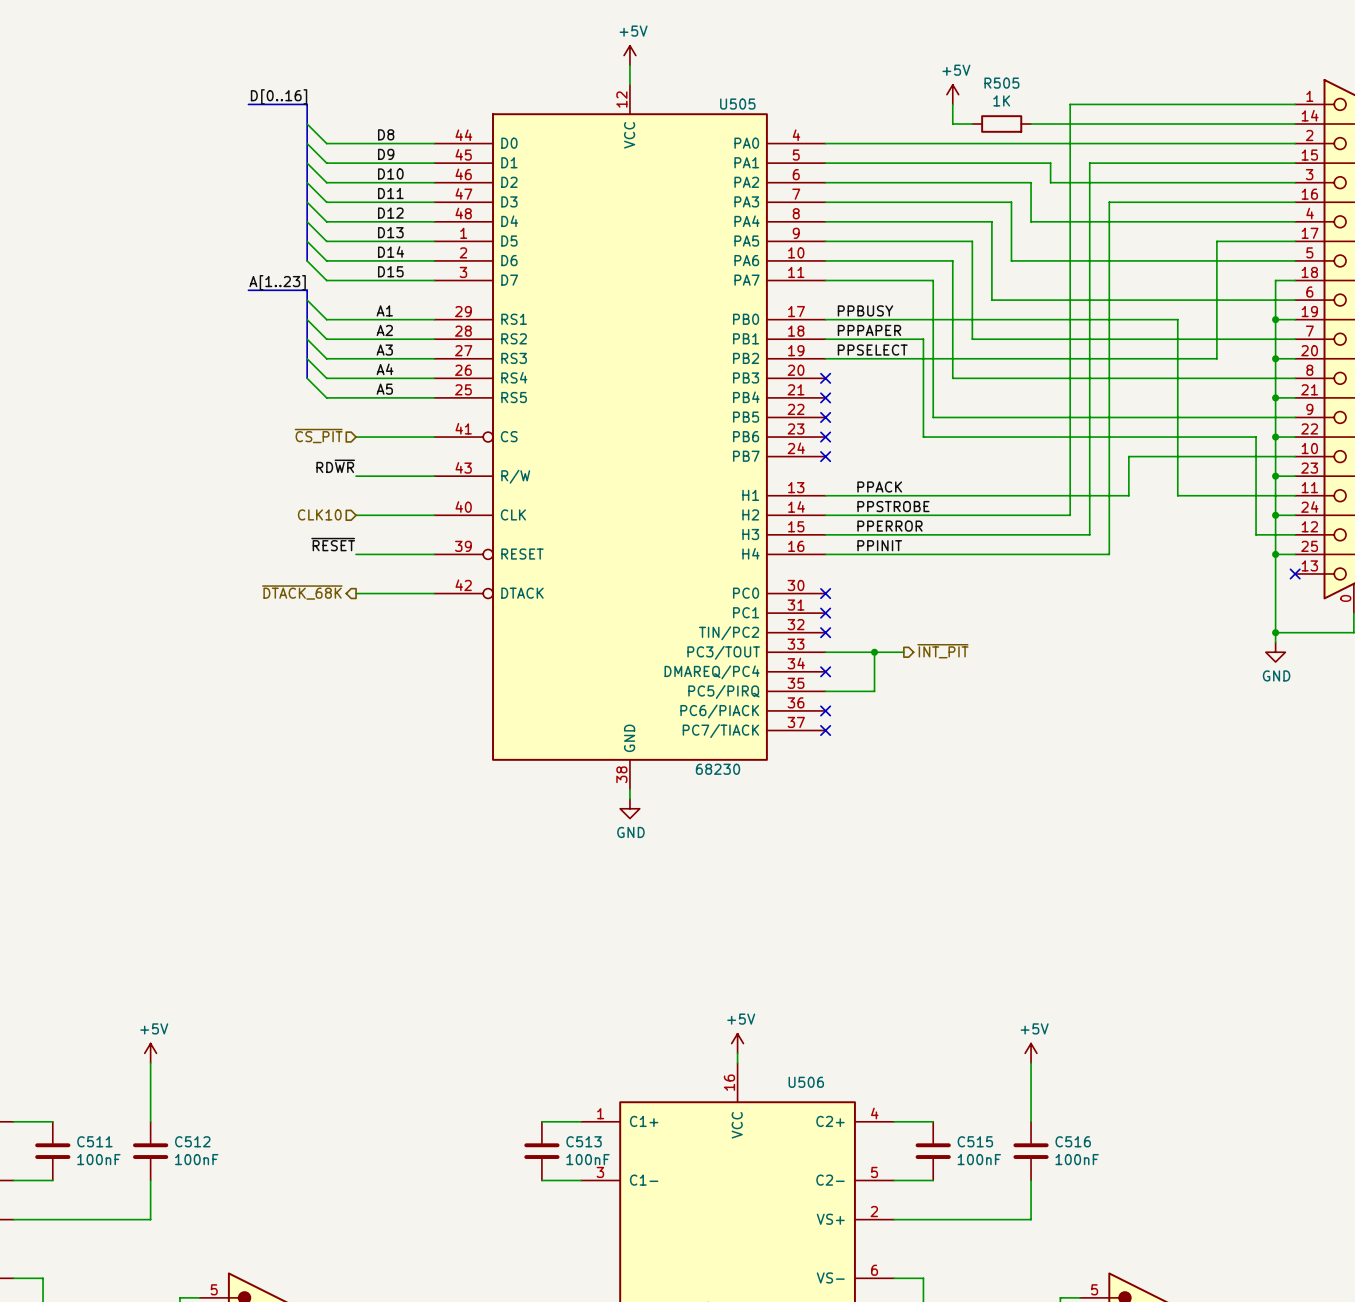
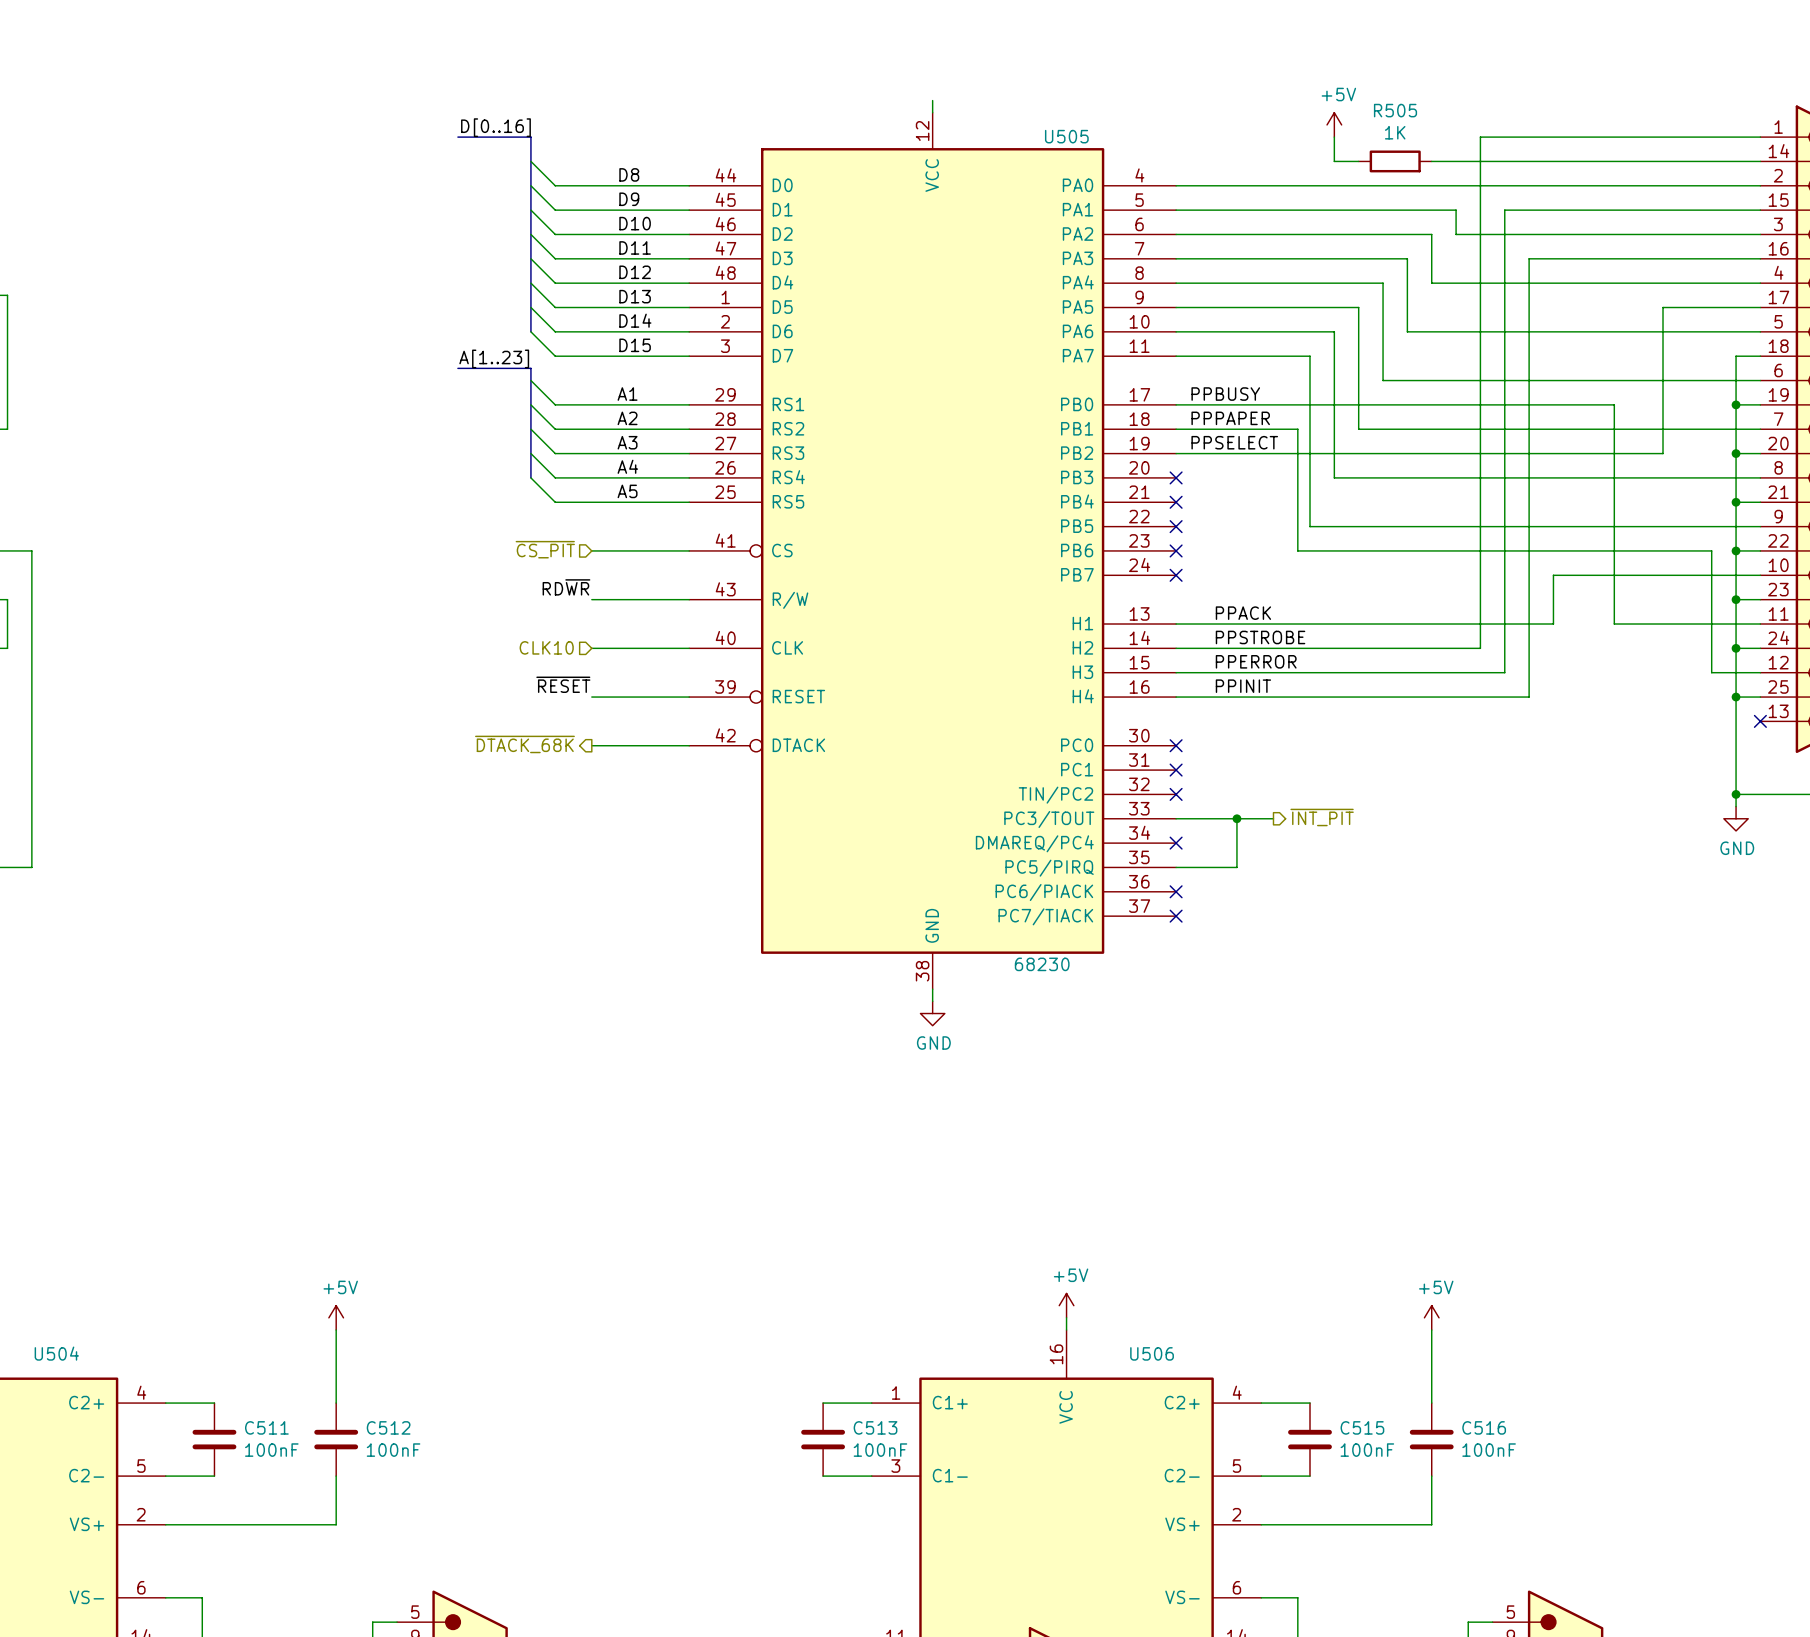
power symbol: +5V (629, 55) -> none
wire: (629, 65) (629, 75) -> none

